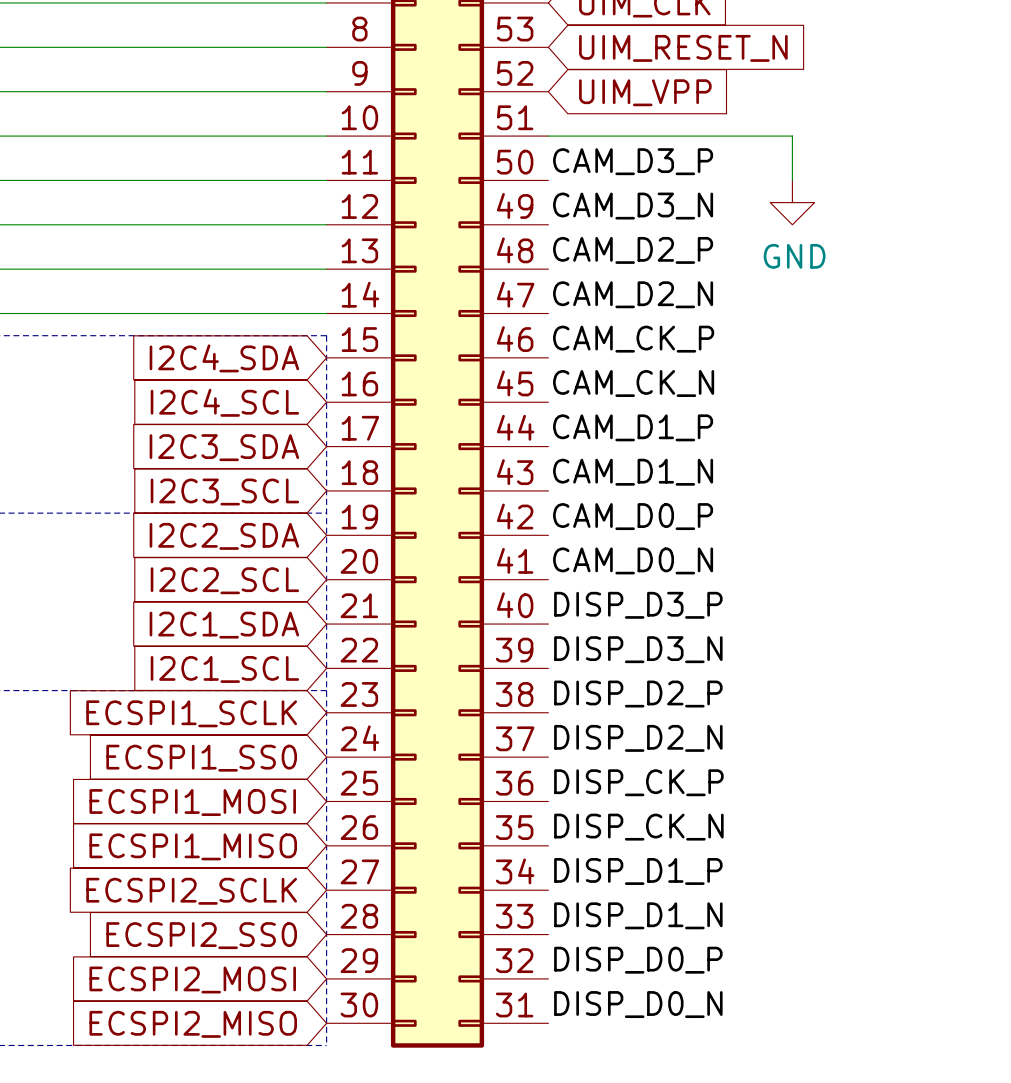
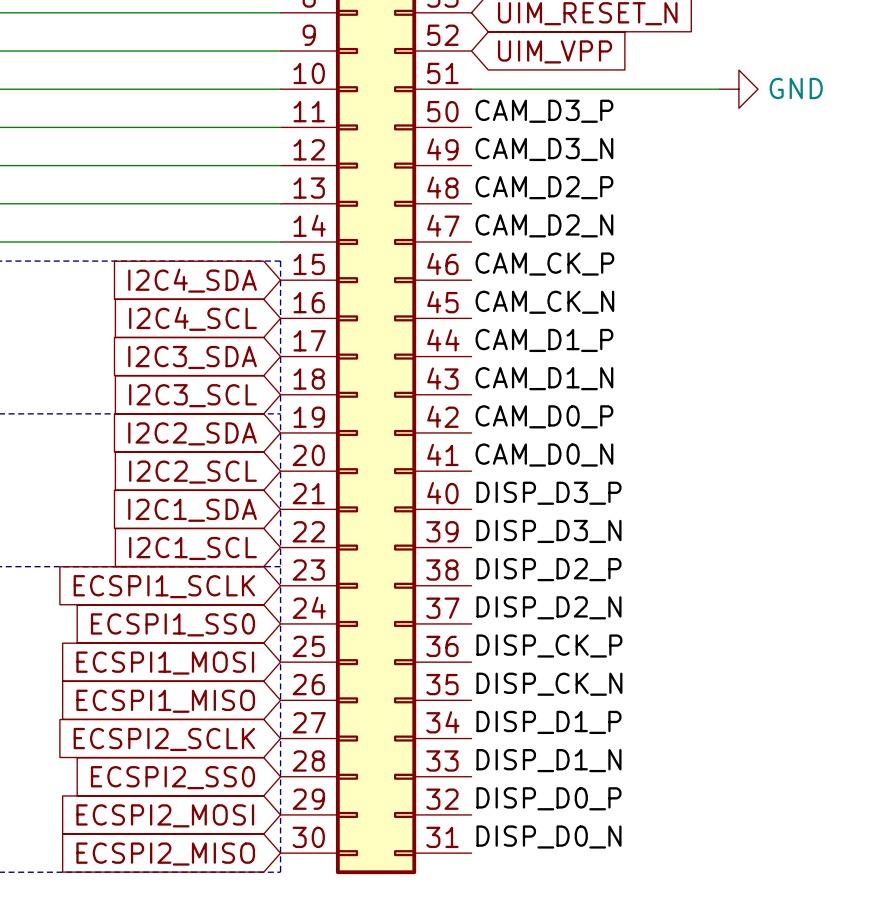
wire: (792, 136) (792, 180) -> (681, 89) (719, 89)
power symbol rotation: 0° (792, 202) -> 90° counterclockwise (738, 89)
power symbol position: GND (792, 202) -> GND (738, 89)

